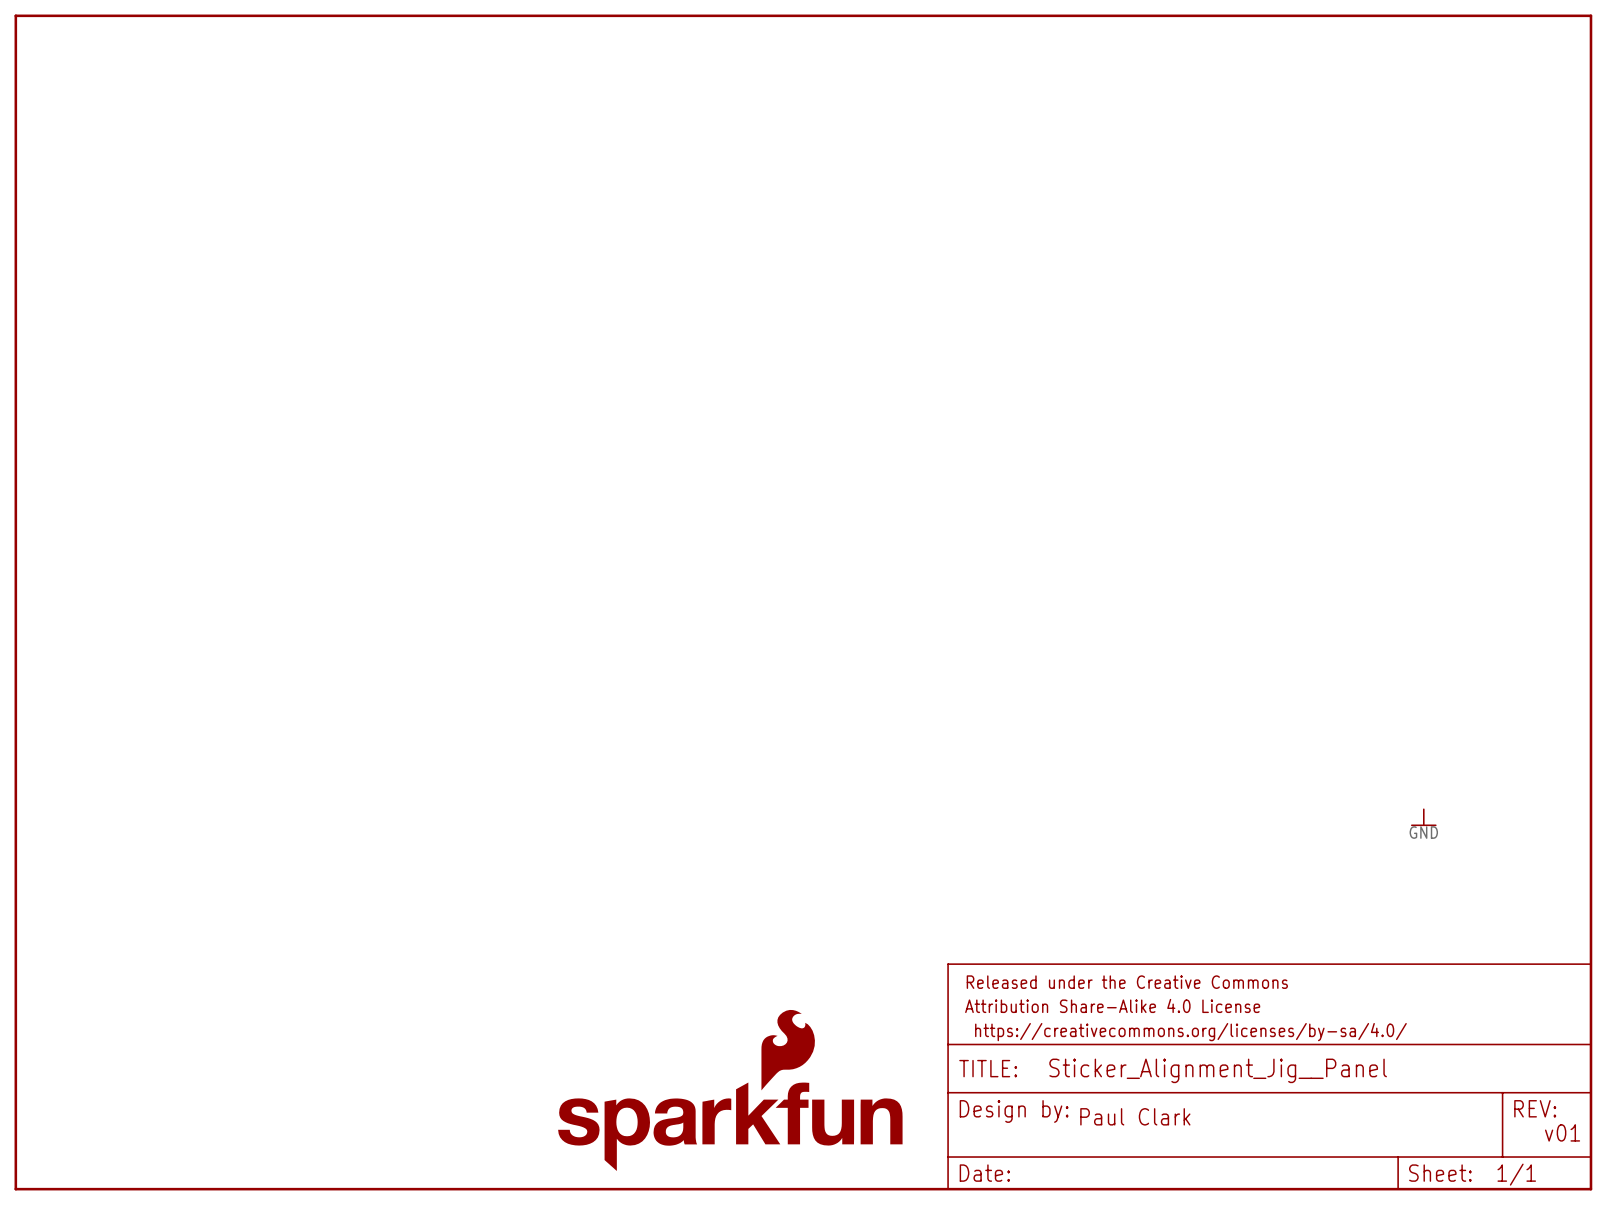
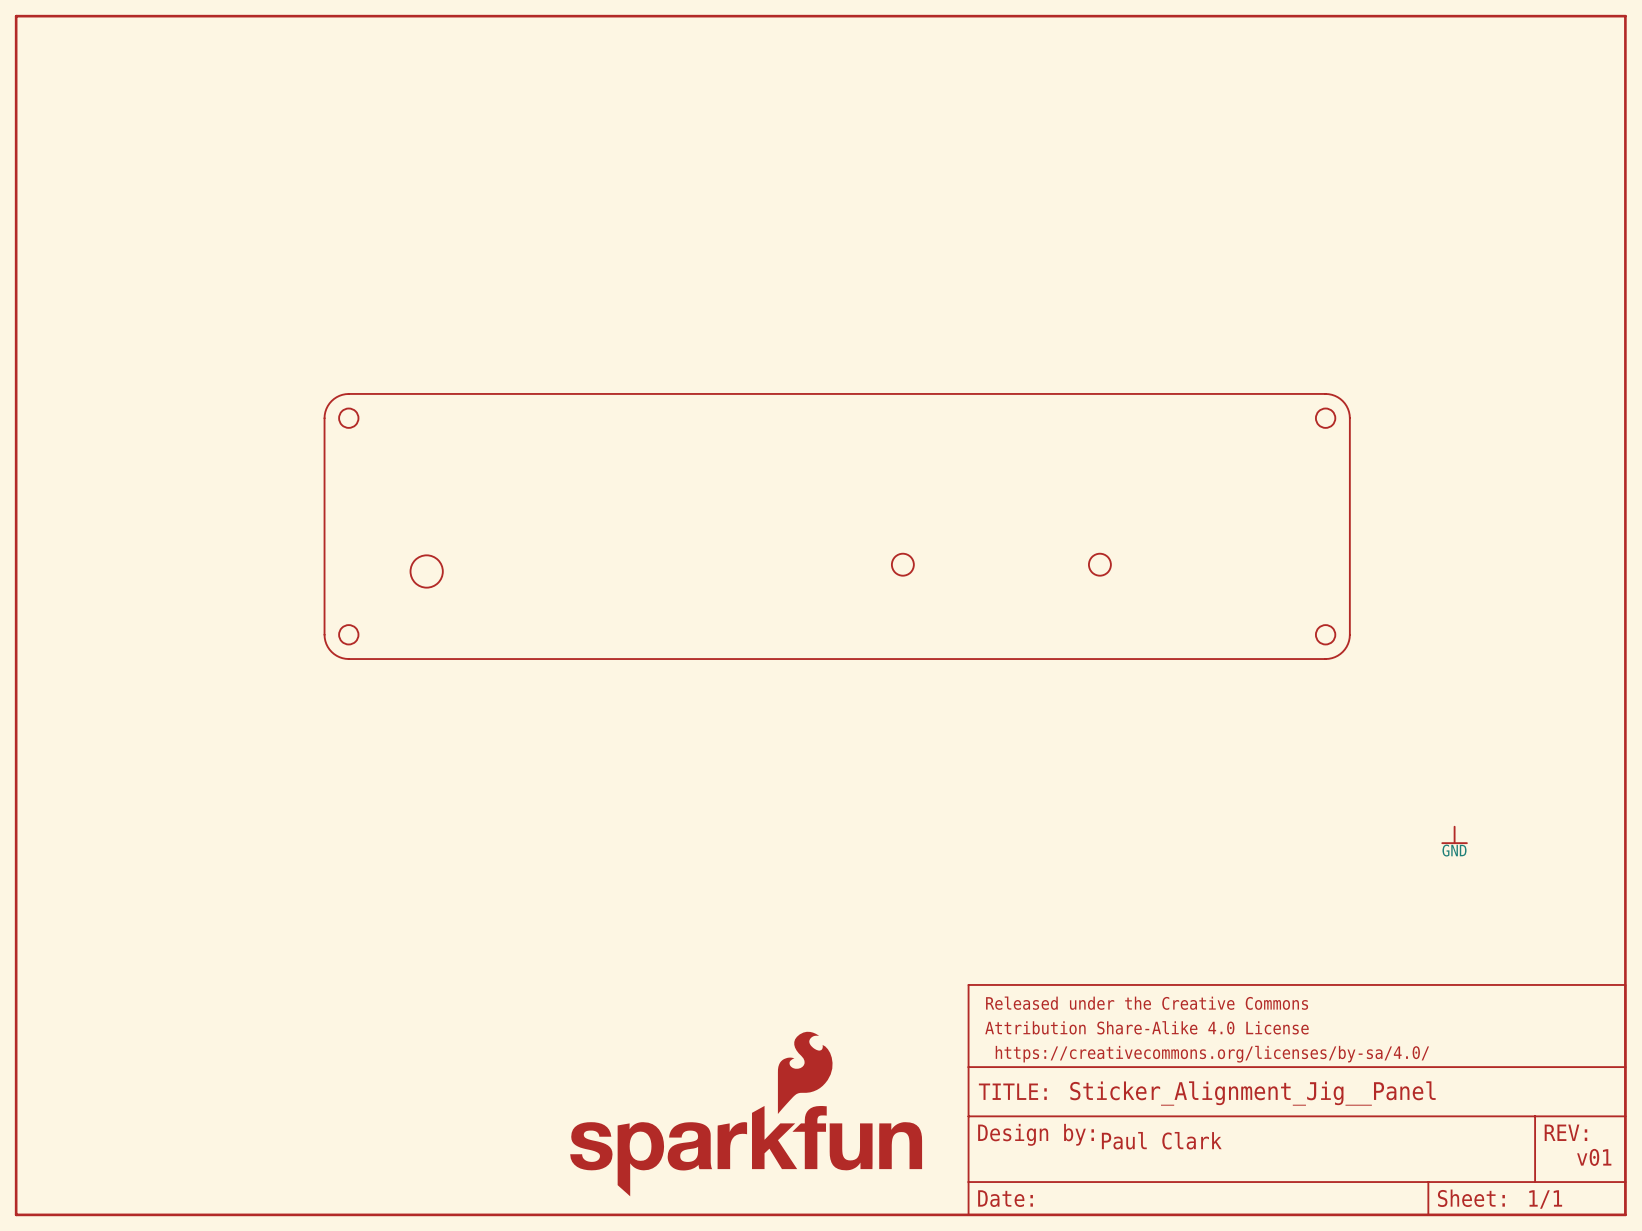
part: none -> (837, 526)
part: none -> (902, 564)
part: none -> (1099, 564)
part: none -> (426, 571)

